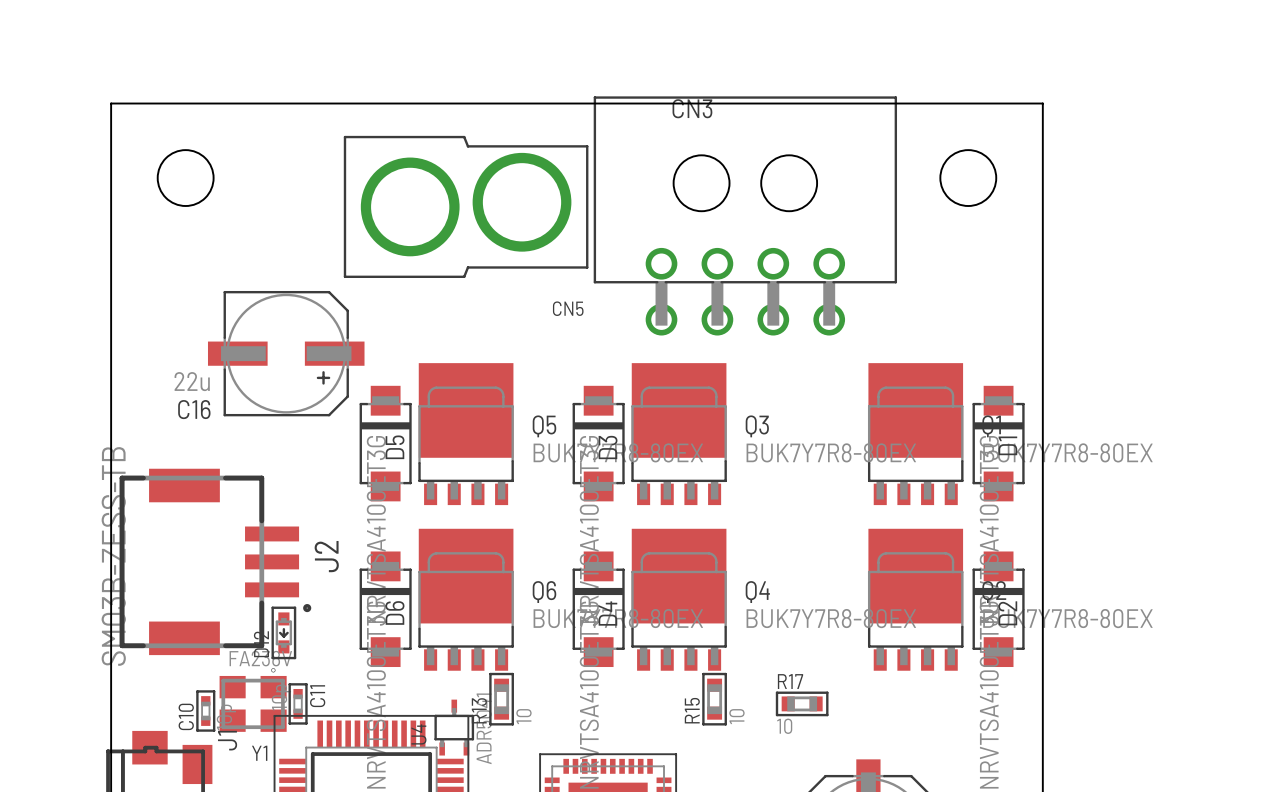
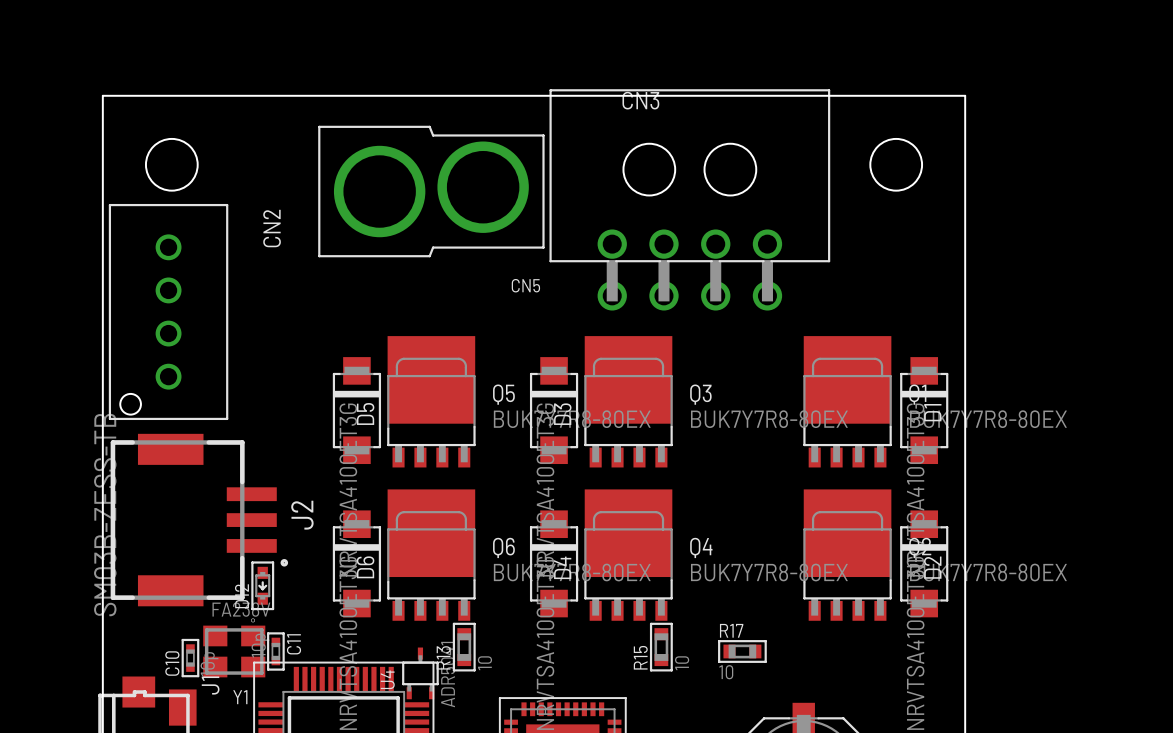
CN2: none -> (168, 311)
C16: 22u (286, 353) -> none

